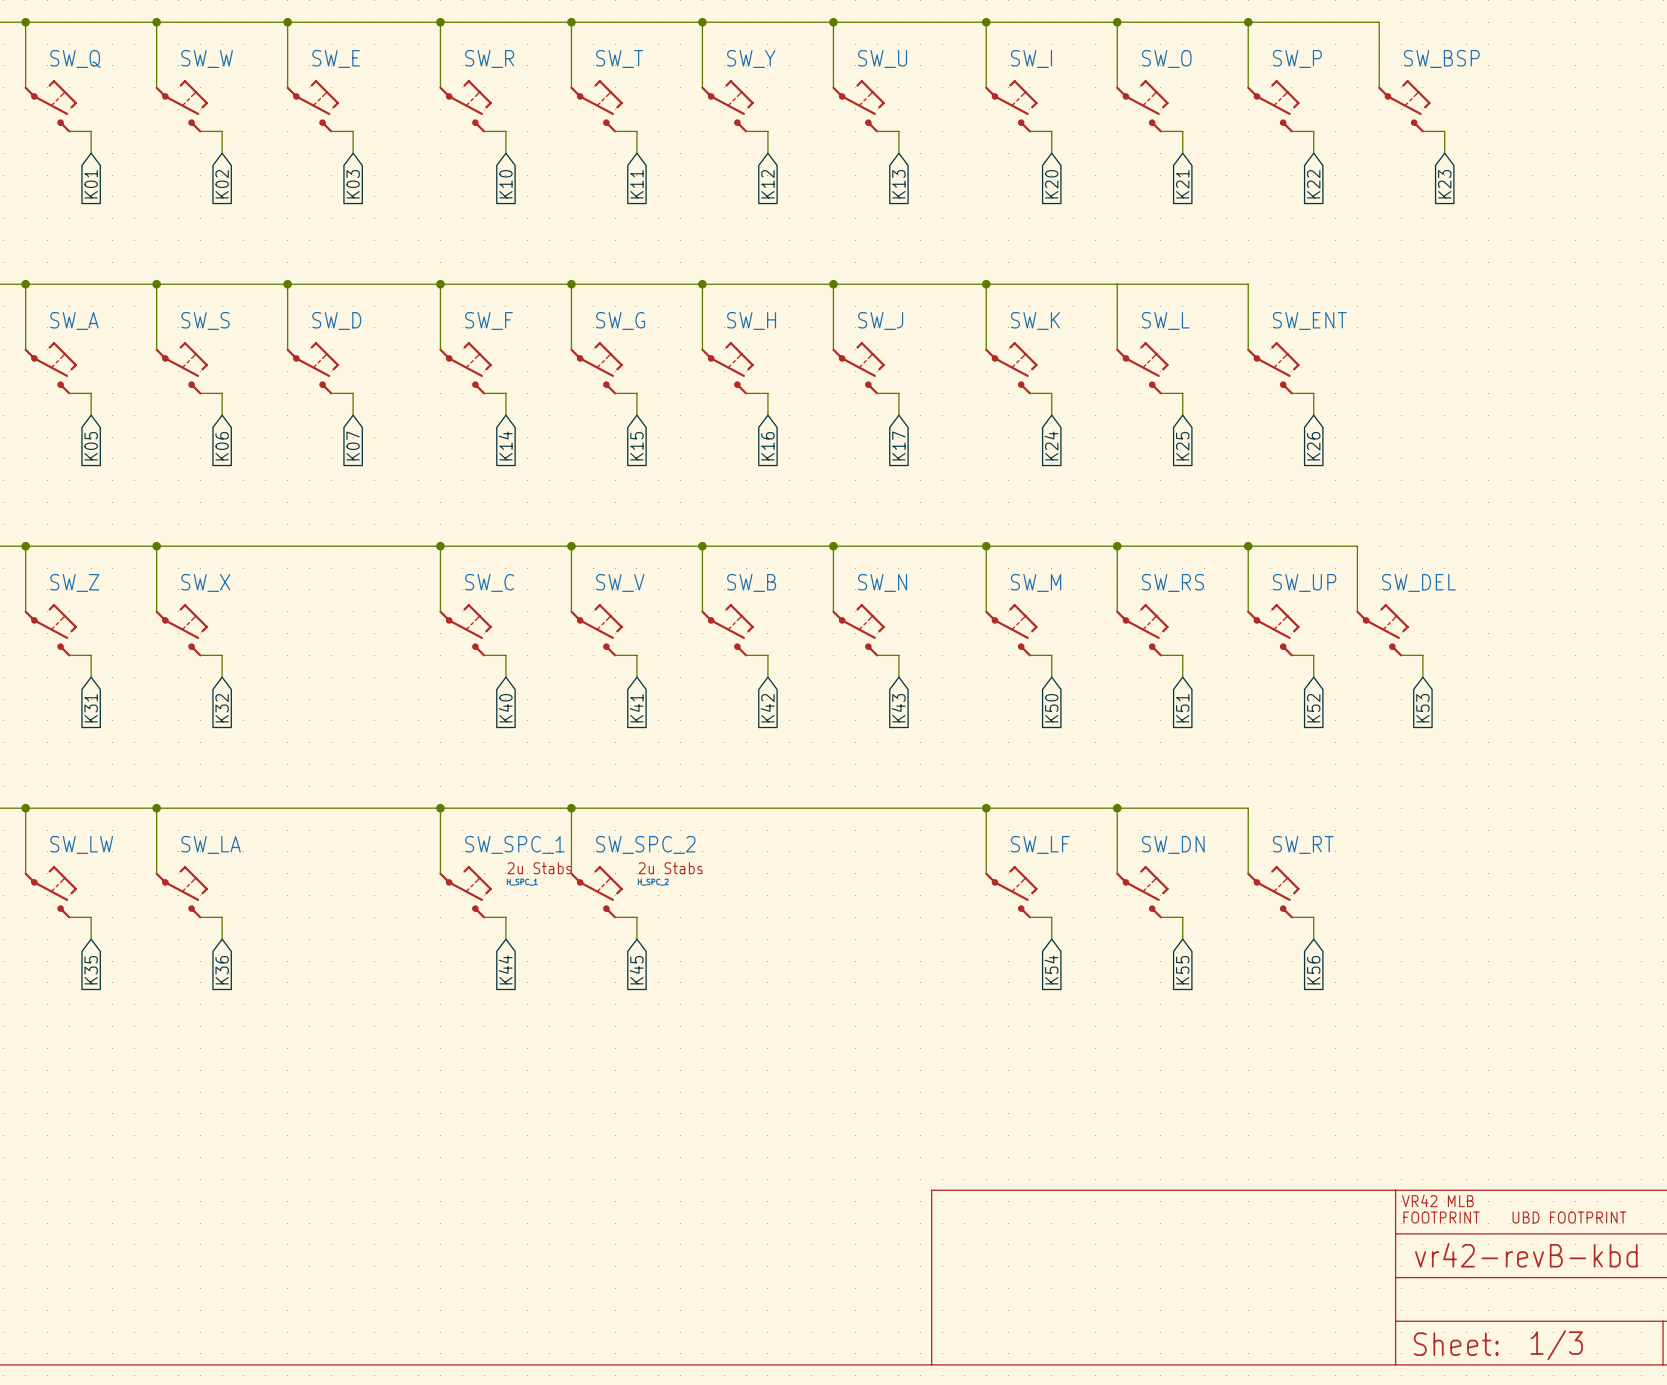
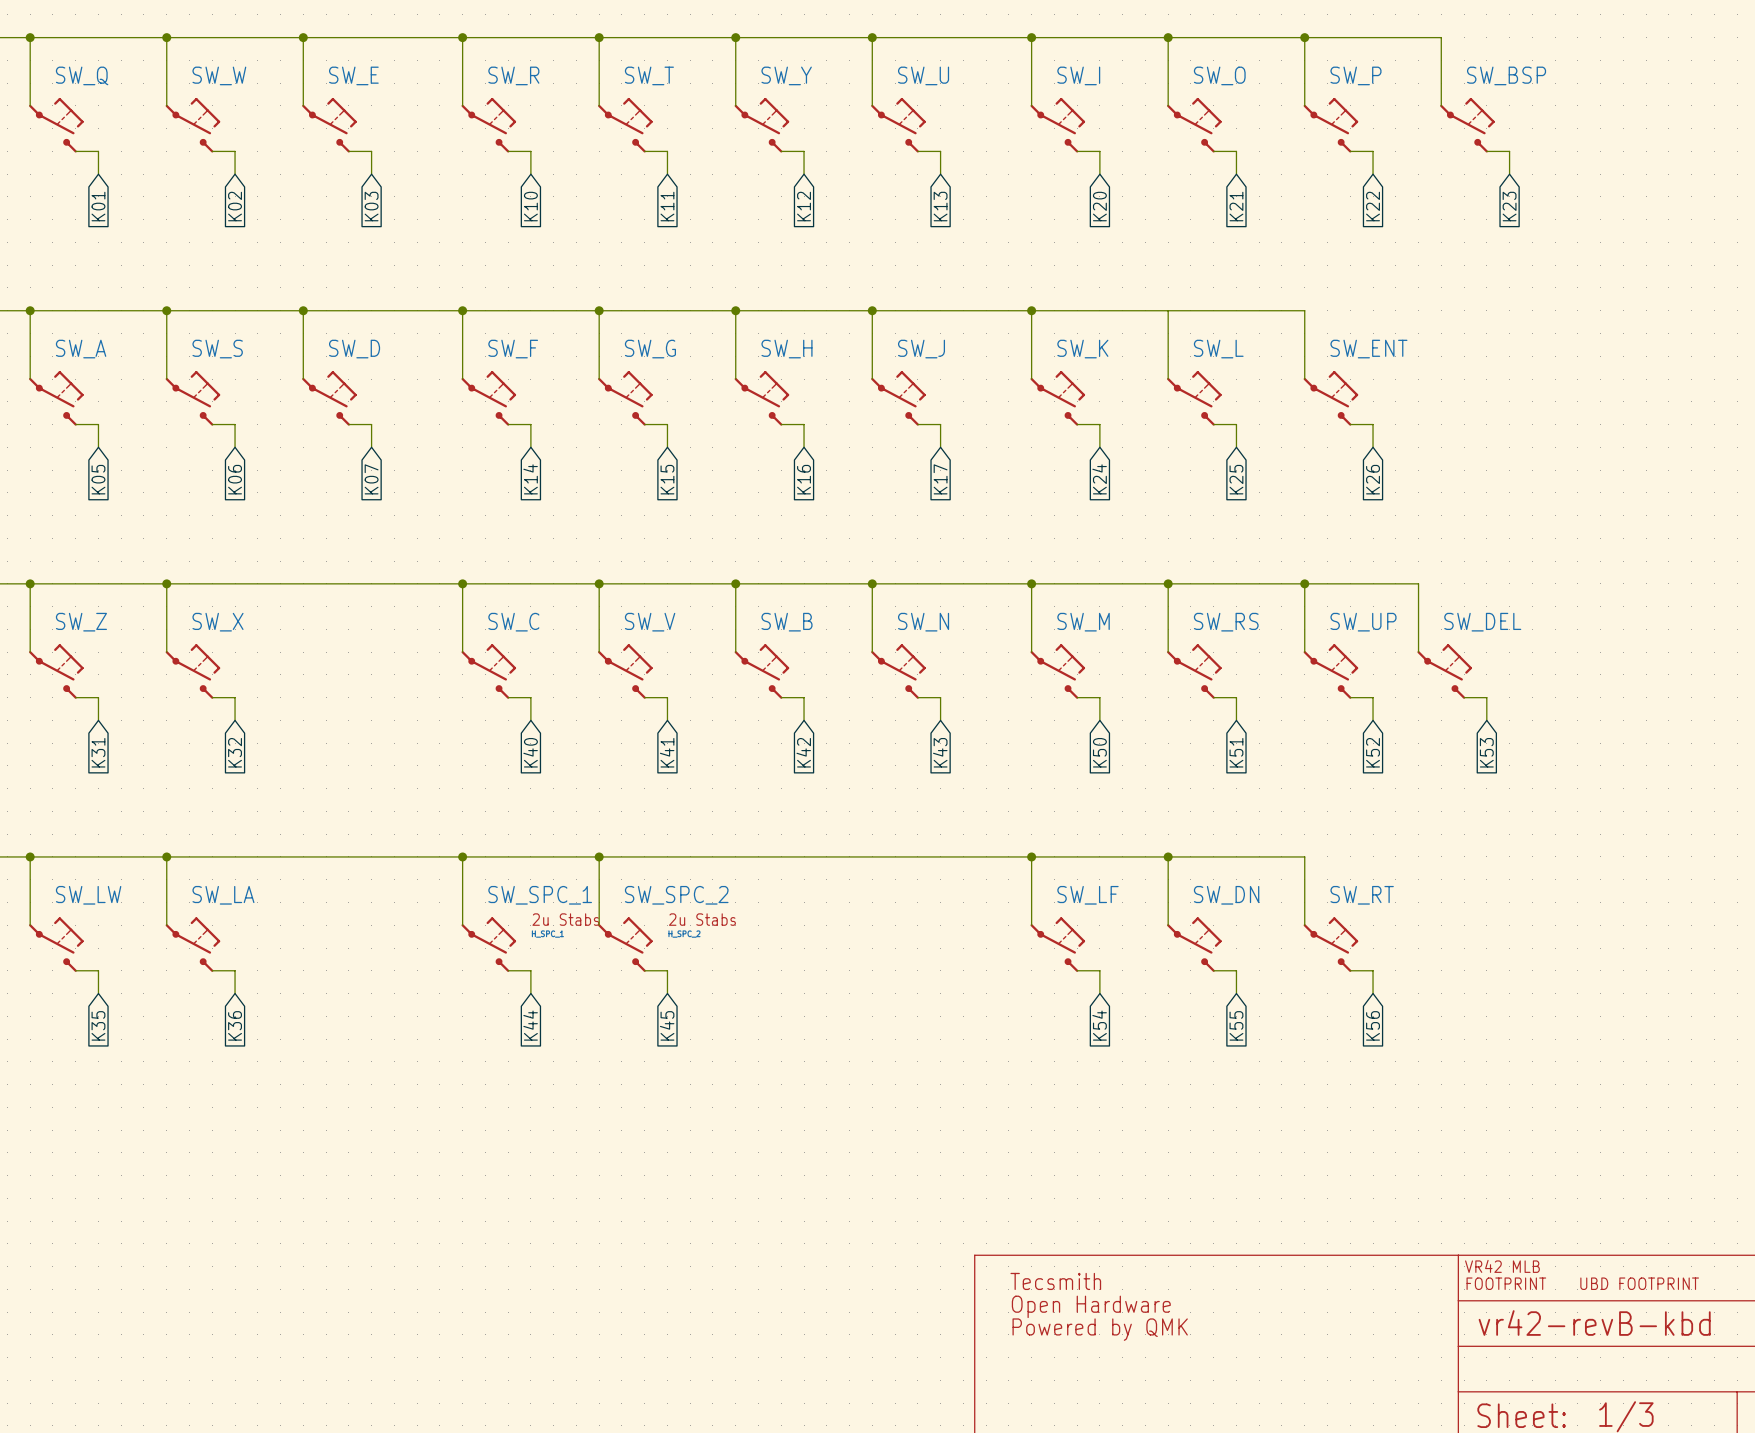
part: none -> (1055, 1281)
part: none -> (1091, 1306)
part: none -> (1100, 1329)

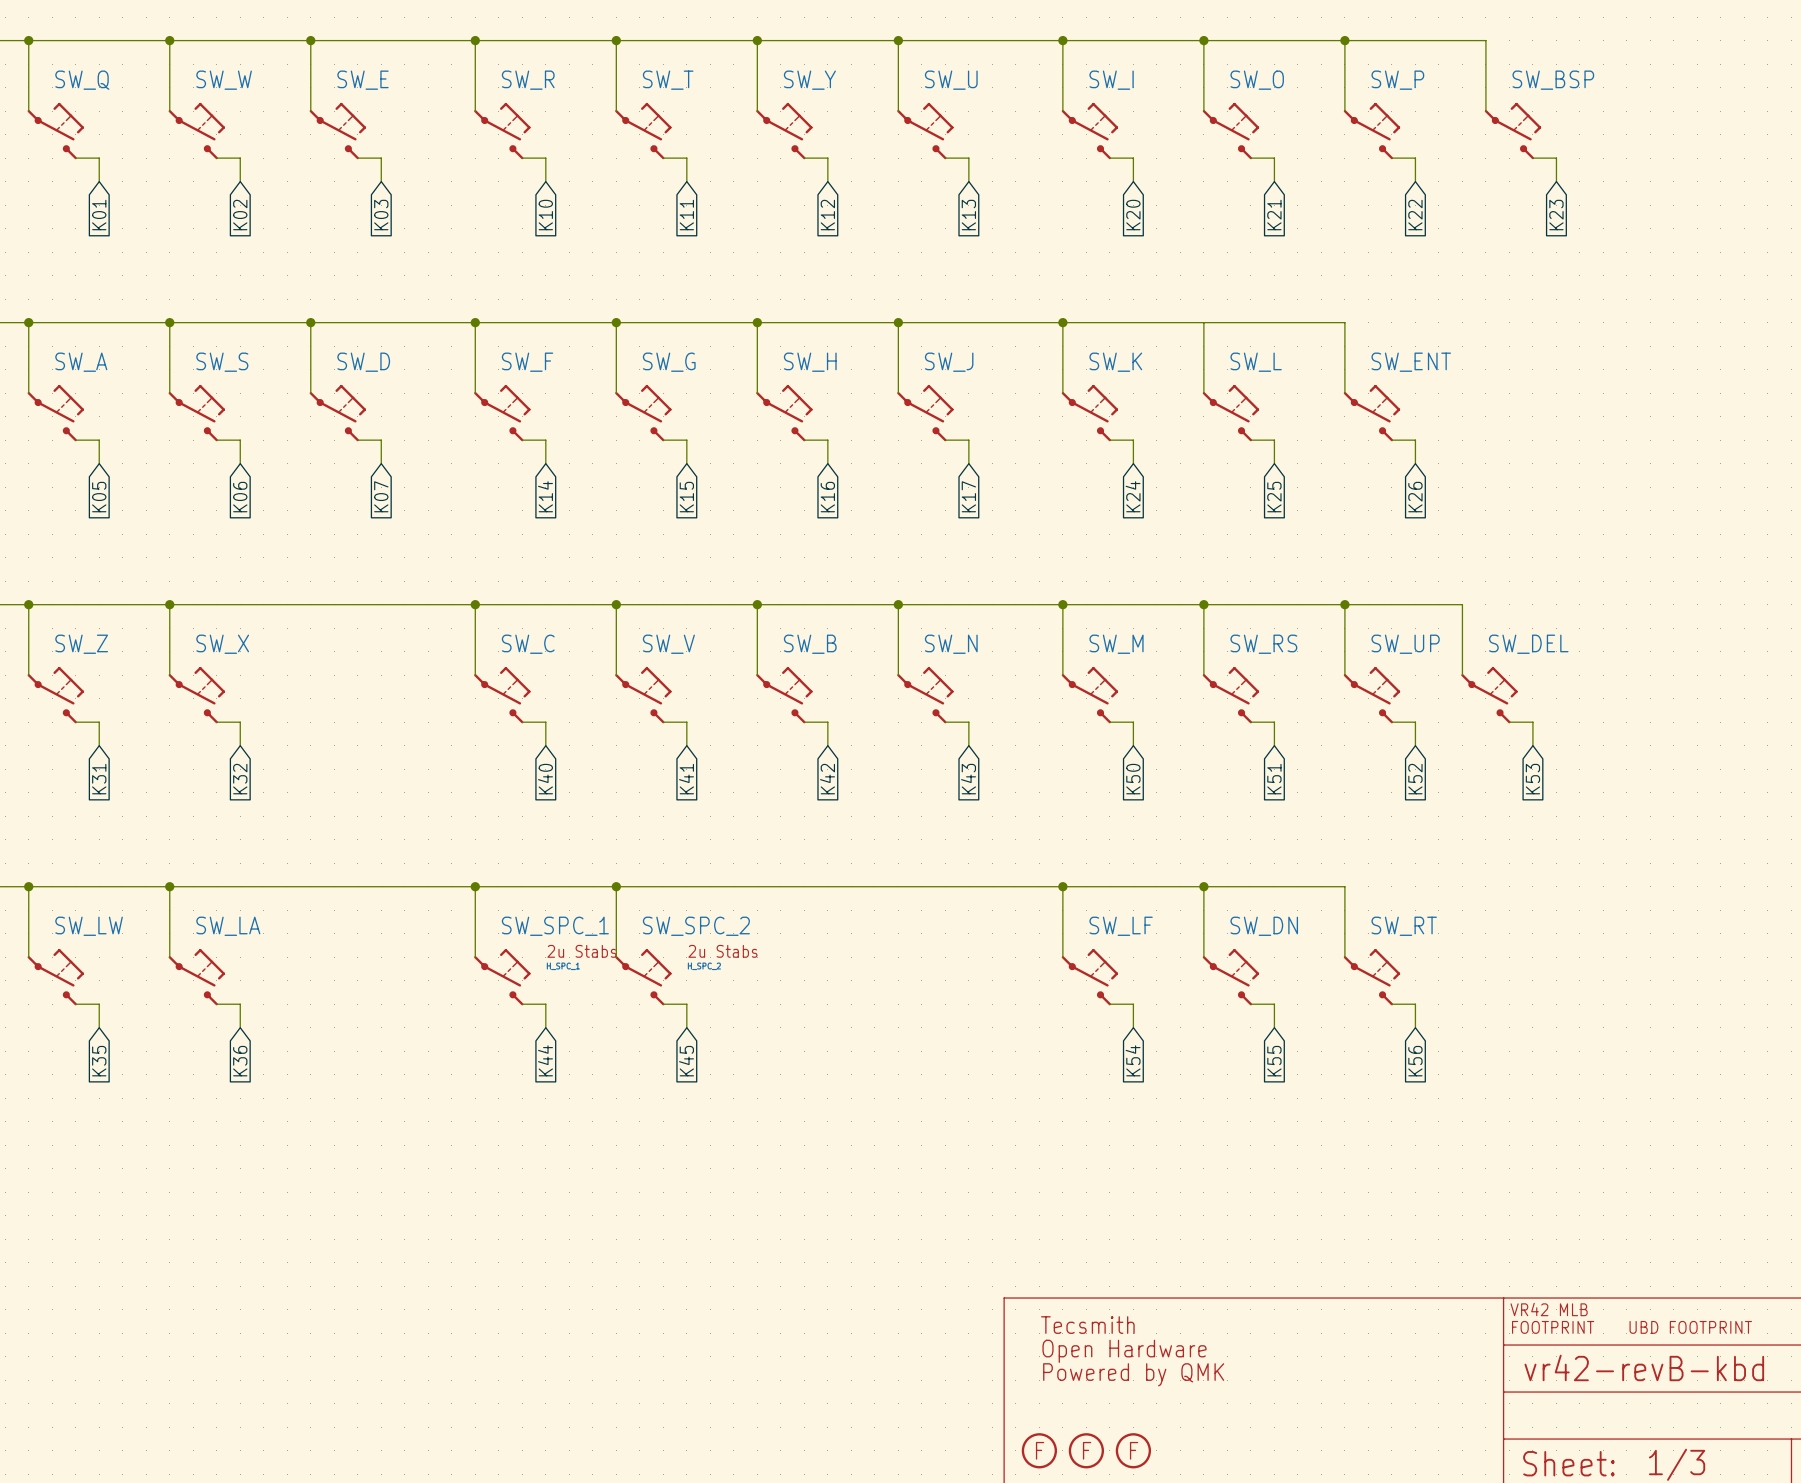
part: none -> (1039, 1450)
part: none -> (1086, 1450)
part: none -> (1133, 1450)

